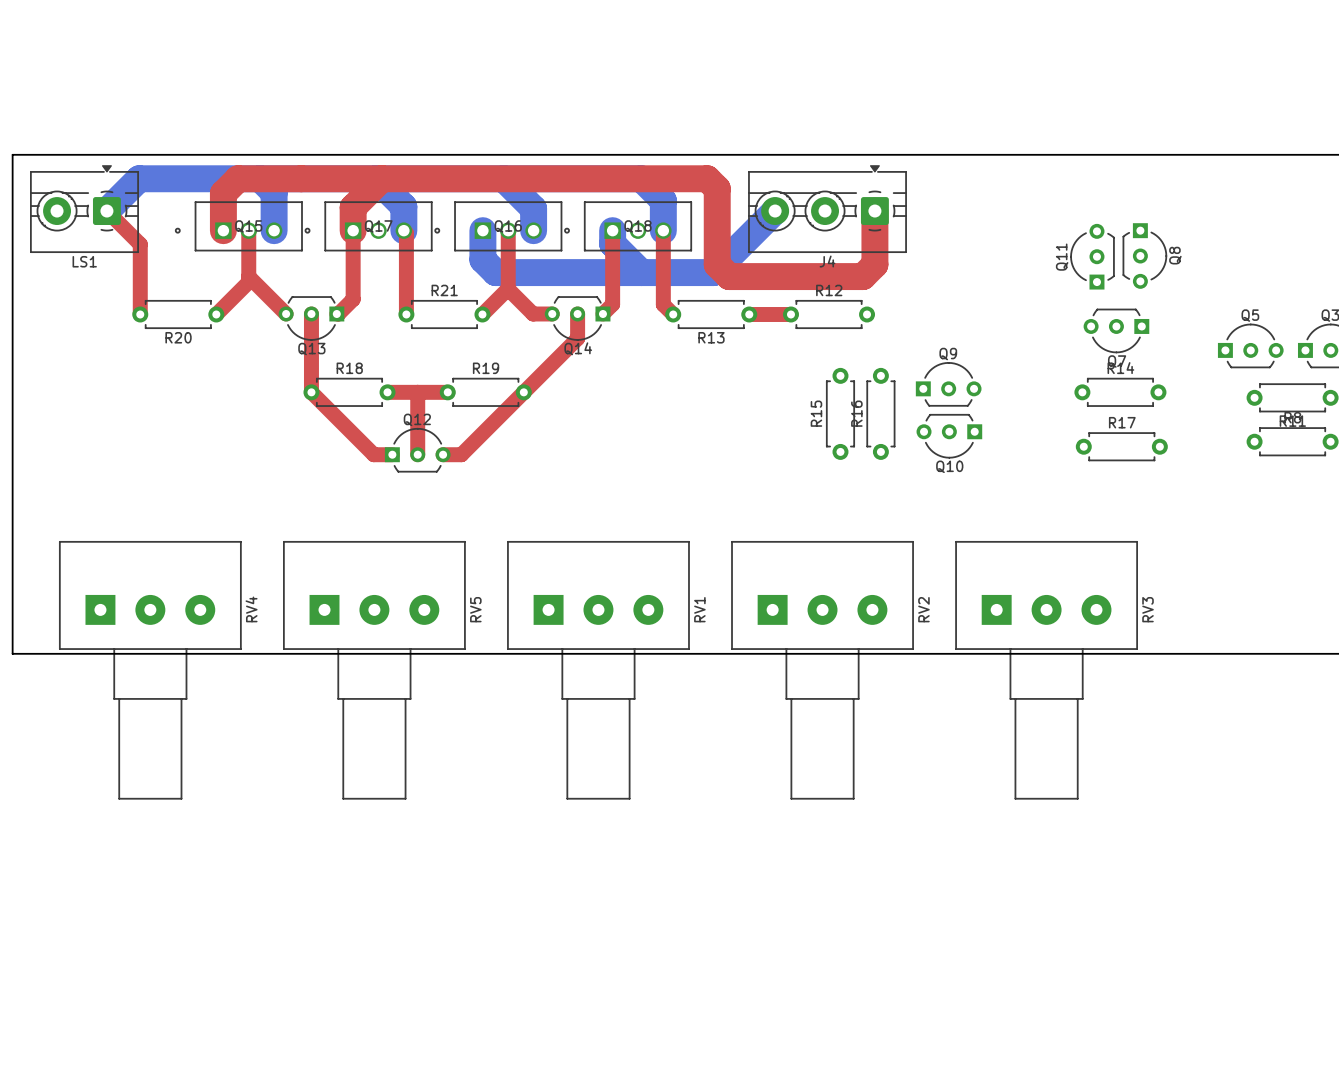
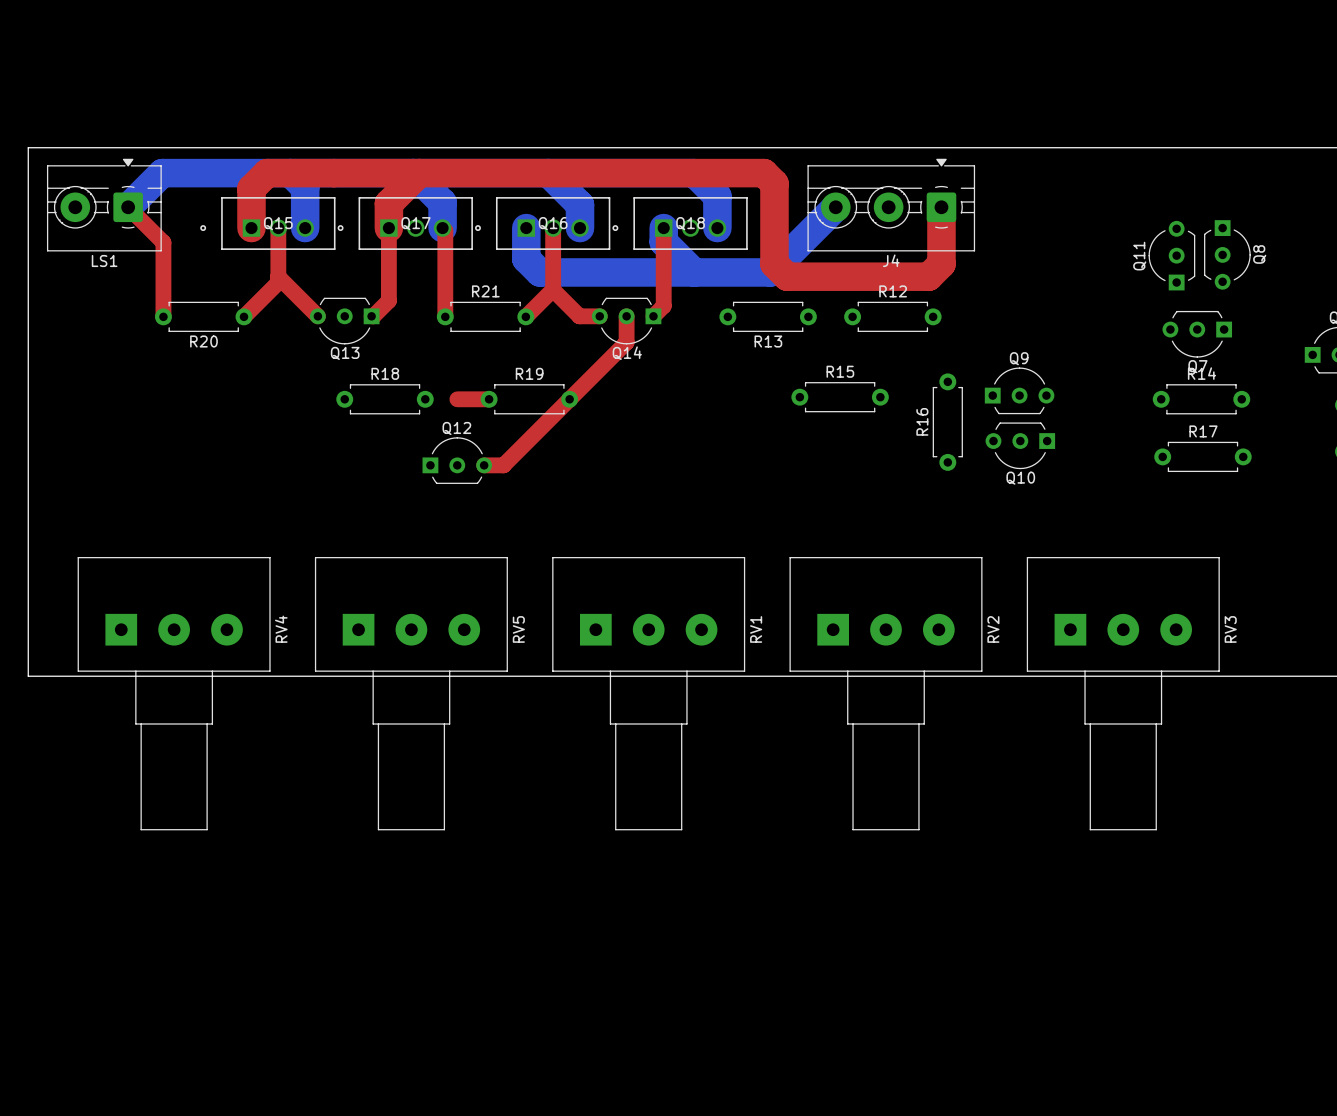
top track: (663, 230) (663, 304) (673, 314) -> none
top track: (311, 313) (311, 392) (373, 454) (392, 454) -> none
top track: (749, 314) (790, 314) -> none
top track: (387, 392) (417, 392) -> none
top track: (417, 392) (417, 454) -> none
R15 rotation: 0° (840, 413) -> 90° clockwise (840, 397)
R15 position: (840, 413) -> (840, 397)

